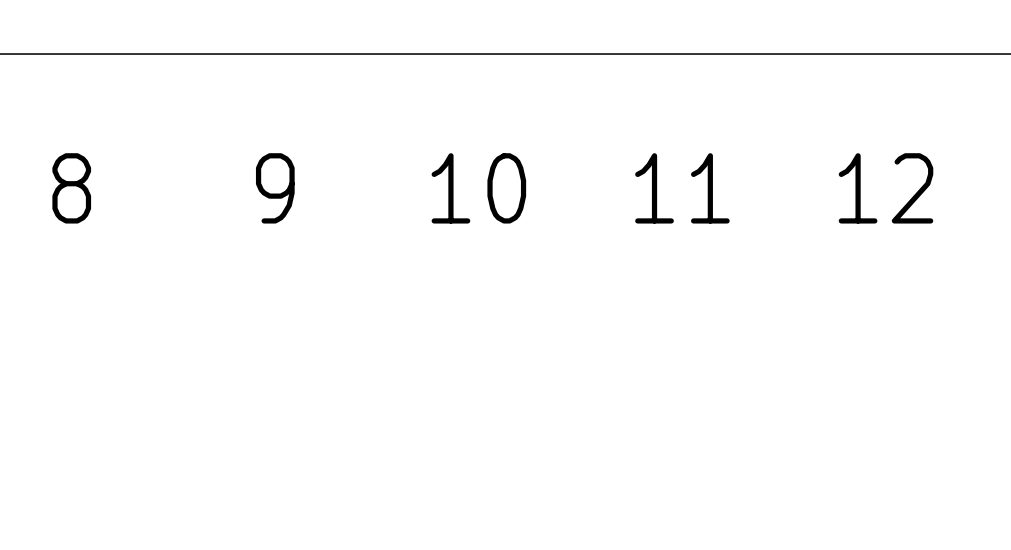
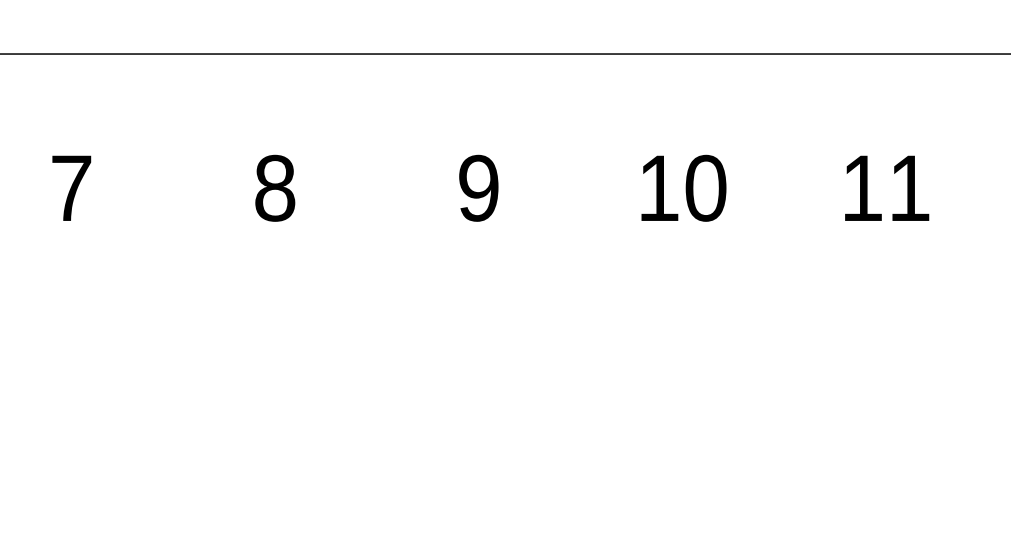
text: 8 (71, 188) -> 7 (71, 188)
text: 9 (275, 188) -> 8 (275, 188)
text: 10 (478, 188) -> 9 (478, 188)
text: 11 (682, 188) -> 10 (684, 188)
text: 12 (885, 188) -> 11 (887, 188)

